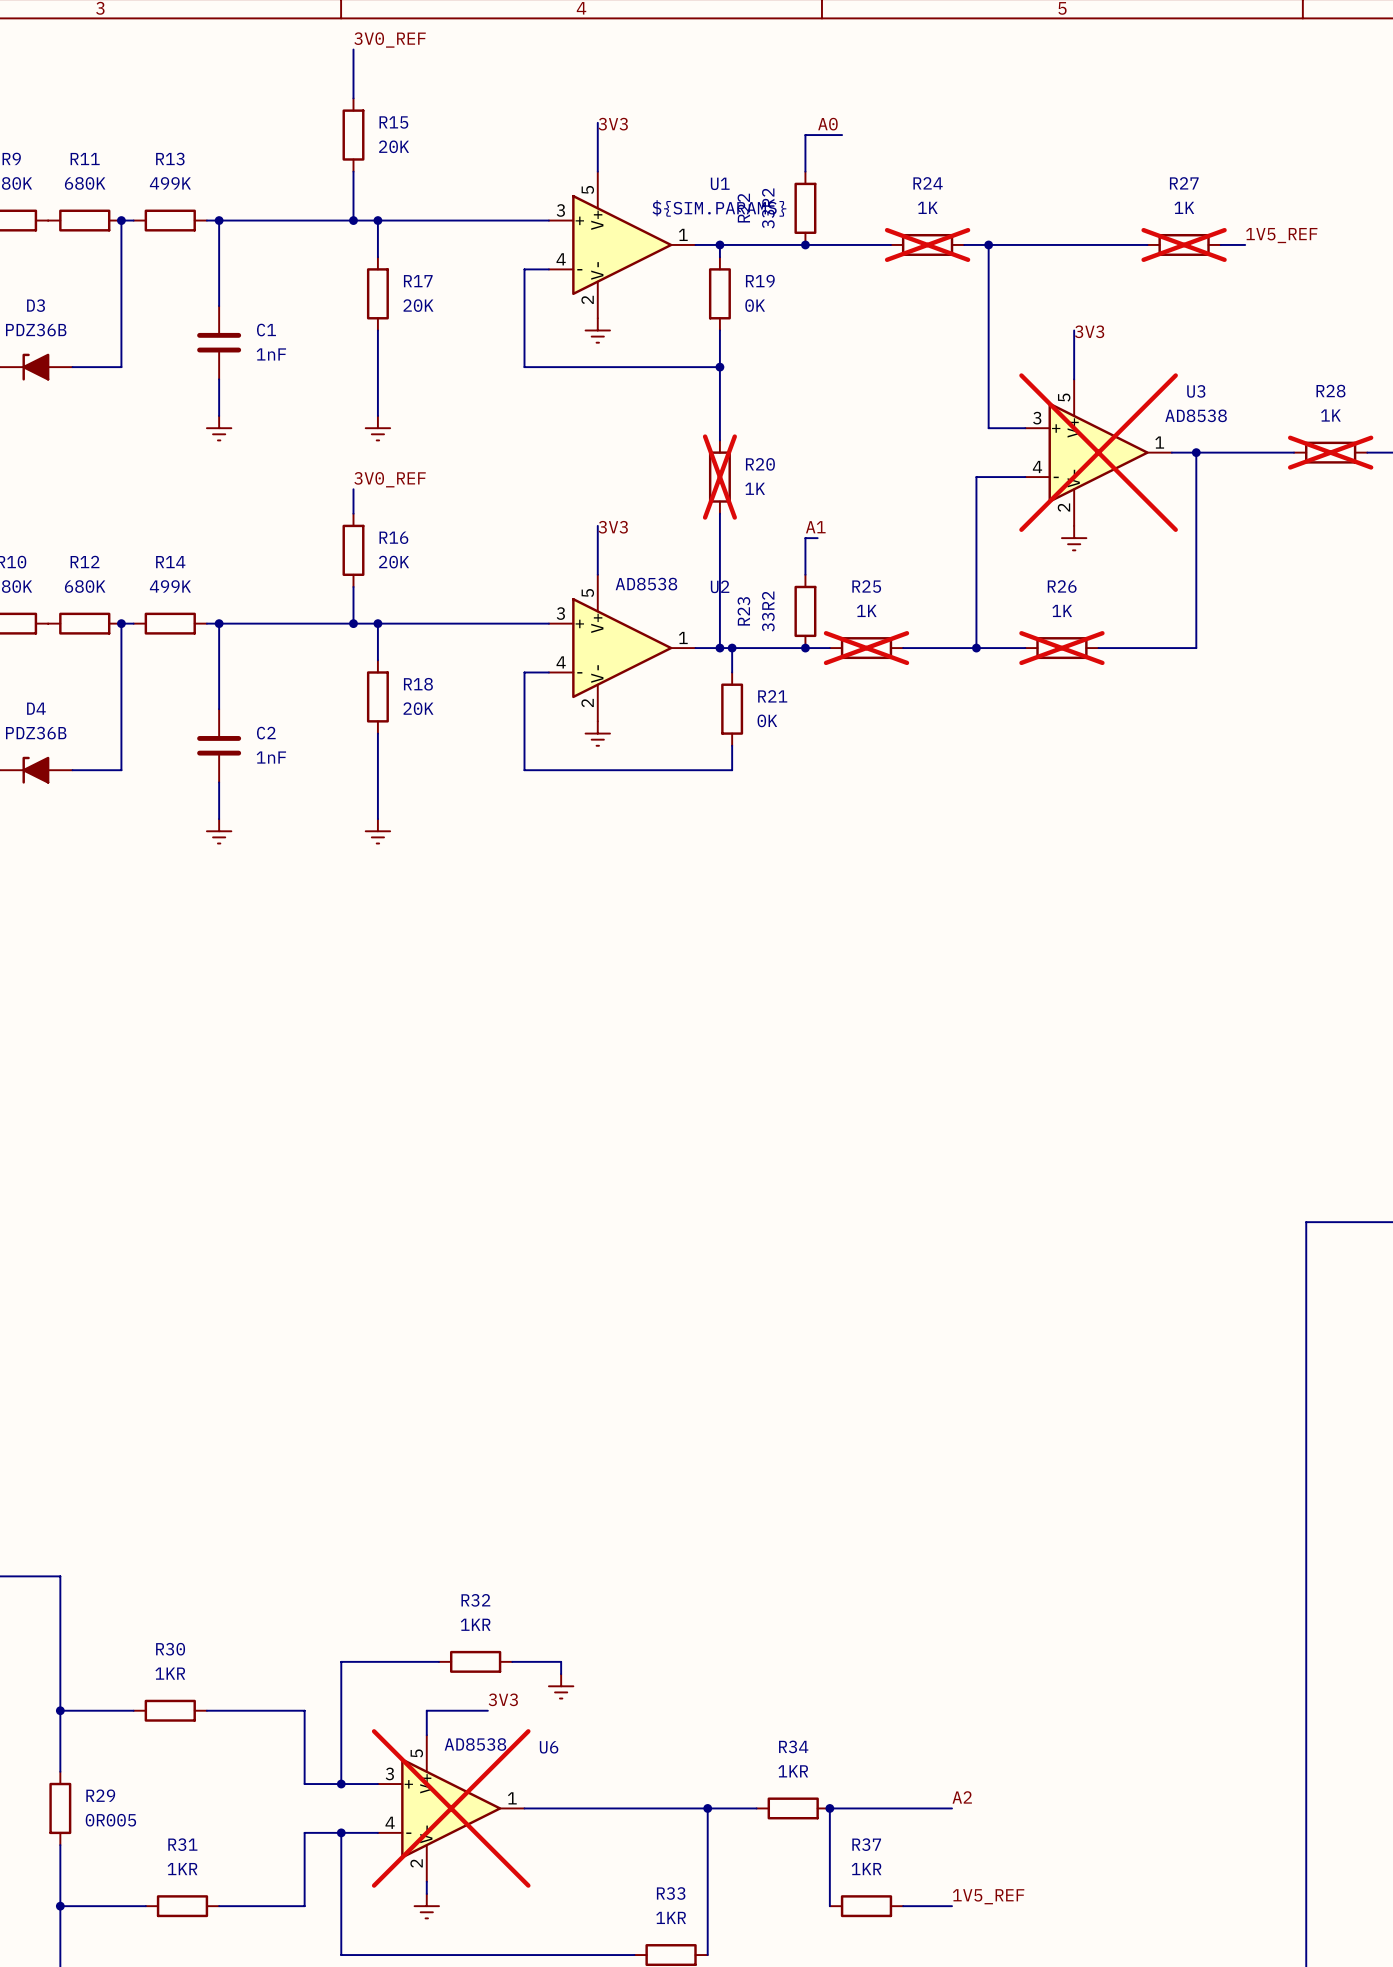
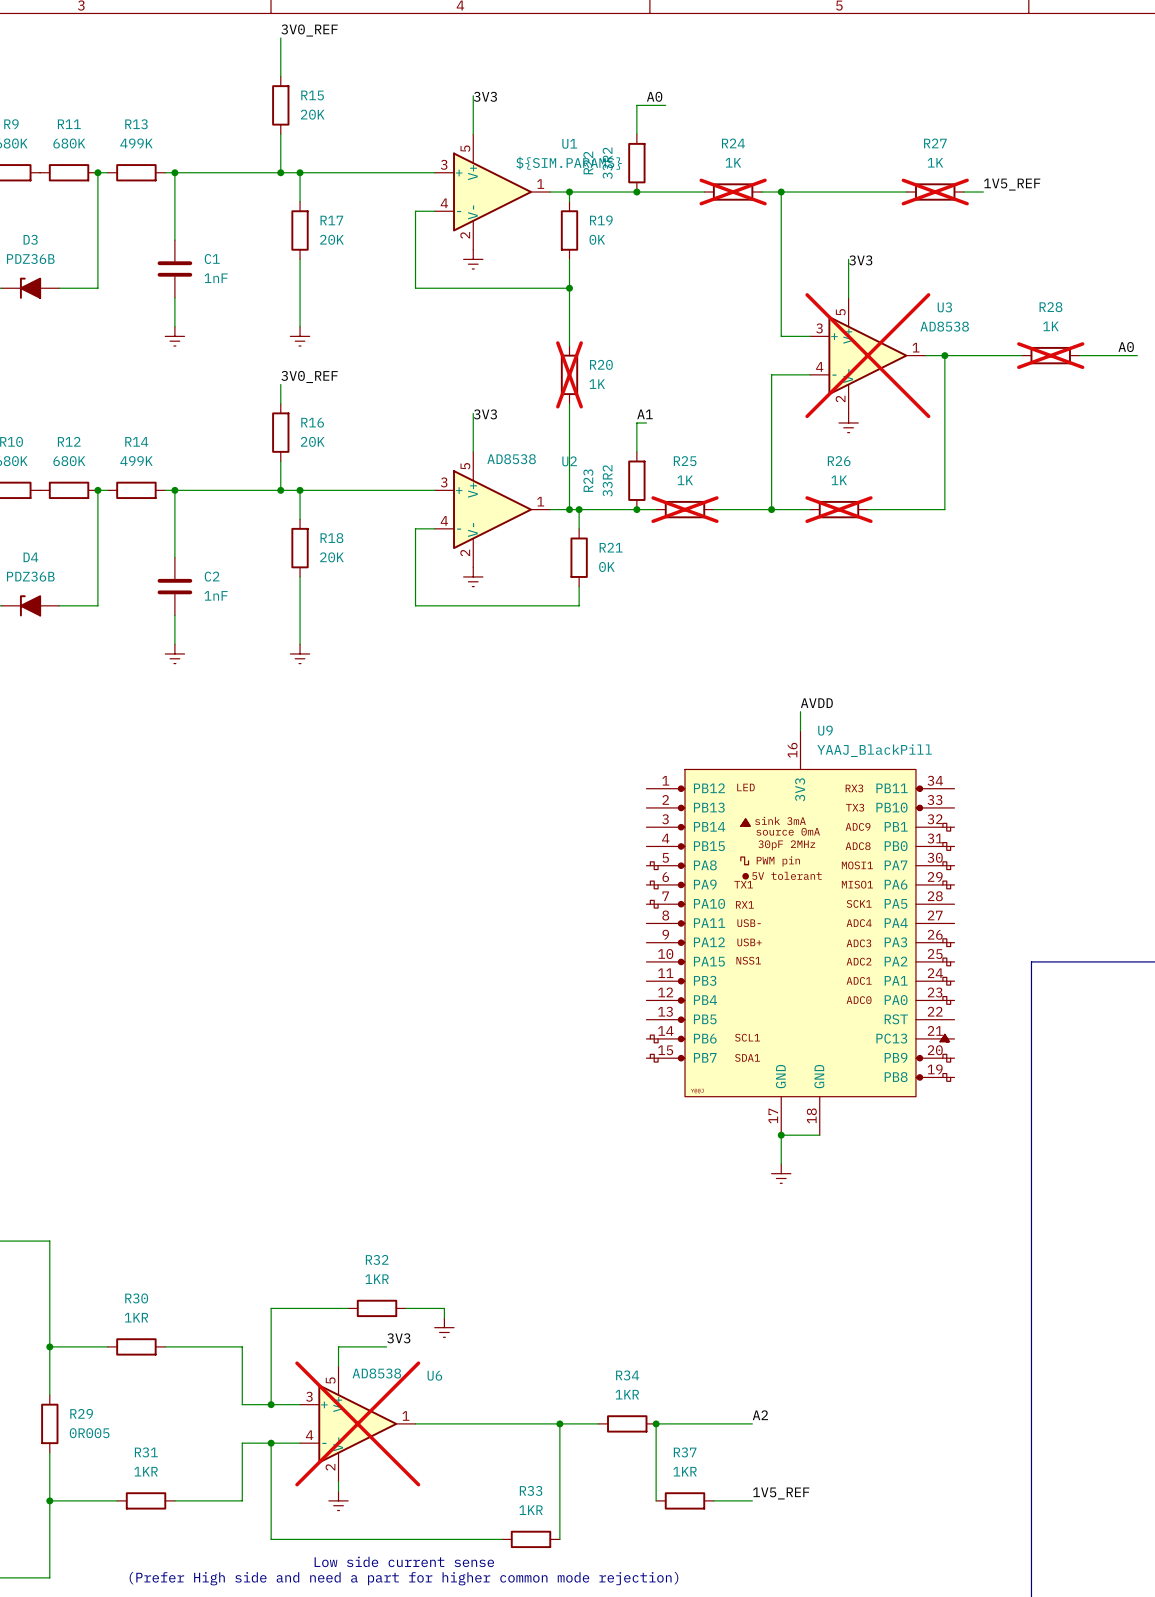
label: none -> AVDD (816, 703)
wire: none -> (800, 711) (800, 730)
U9: none -> YAAJ_BlackPill (800, 933)
junction: none -> (781, 1135)
wire: none -> (819, 1135) (781, 1135) (781, 1164)
power symbol: none -> (781, 1173)

